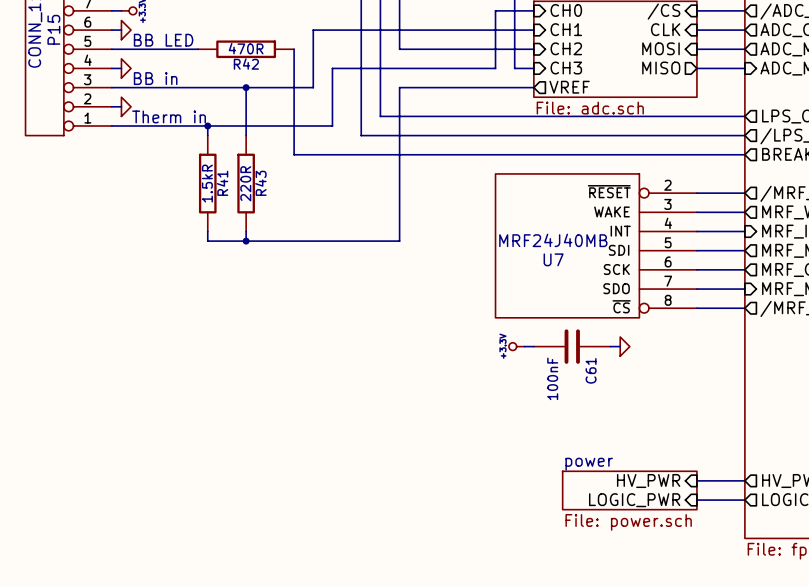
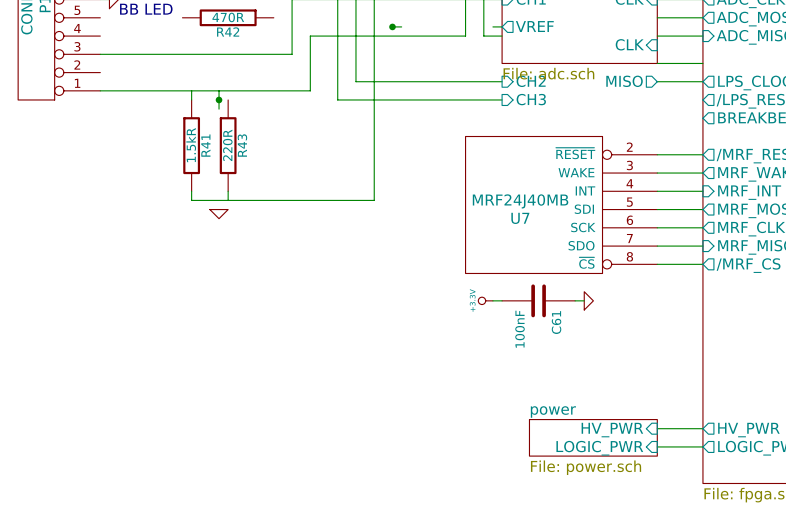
sheet pin position: CH2 (566, 48) -> CH2 (531, 81)
sheet pin: MOSI (660, 48) -> none
wire: (111, 49) (198, 49) -> none
wire: (294, 49) (294, 154) (744, 154) -> none
wire: (399, 49) (533, 49) -> (374, 17) (374, 54)
wire: none -> (392, 26) (401, 26)
junction: none -> (392, 26)
wire: none -> (492, 26) (502, 26)
wire: (111, 68) (121, 68) -> none
power symbol: (126, 68) -> none
sheet pin position: CH3 (566, 68) -> CH3 (531, 99)
sheet pin: MISO (661, 68) -> none
sheet pin: none -> CLK (629, 44)
text: BB in (155, 78) -> none
wire: (246, 87) (246, 135) -> none
junction: (246, 87) -> none
wire: (399, 87) (533, 87) -> none
sheet pin position: VREF (569, 87) -> VREF (534, 26)
wire: none -> (657, 63) (702, 63)
wire: (111, 106) (121, 106) -> none
power symbol: (126, 106) -> none
sheet pin: none -> MISO (624, 81)
text: Therm in (169, 116) -> none
wire: (533, 116) (696, 116) -> none
junction: (207, 125) -> none
wire: none -> (219, 90) (219, 109)
junction: none -> (219, 99)
wire: (533, 135) (744, 135) -> none
junction: (246, 241) -> none
power symbol: none -> (219, 214)

